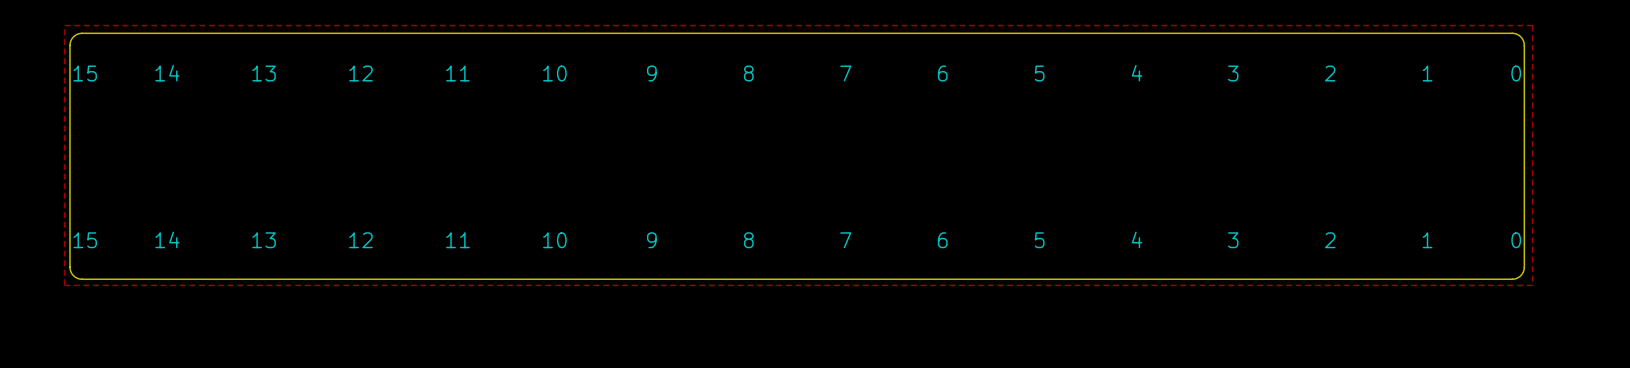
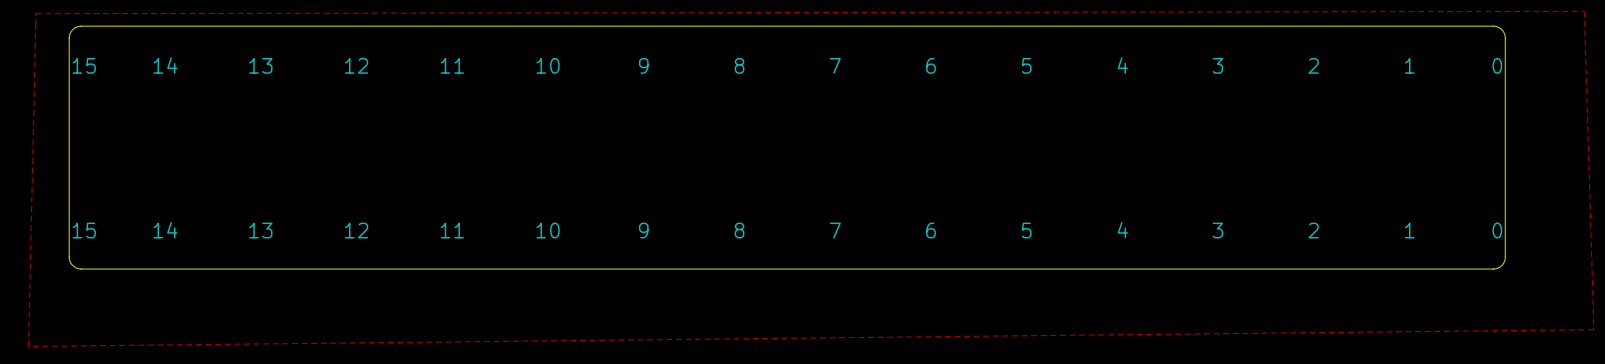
zone outline: (64, 25) (64, 285) (1532, 285) (1532, 25) (64, 25) -> (1584, 11) (35, 13) (28, 346) (1593, 329) (1584, 11)

